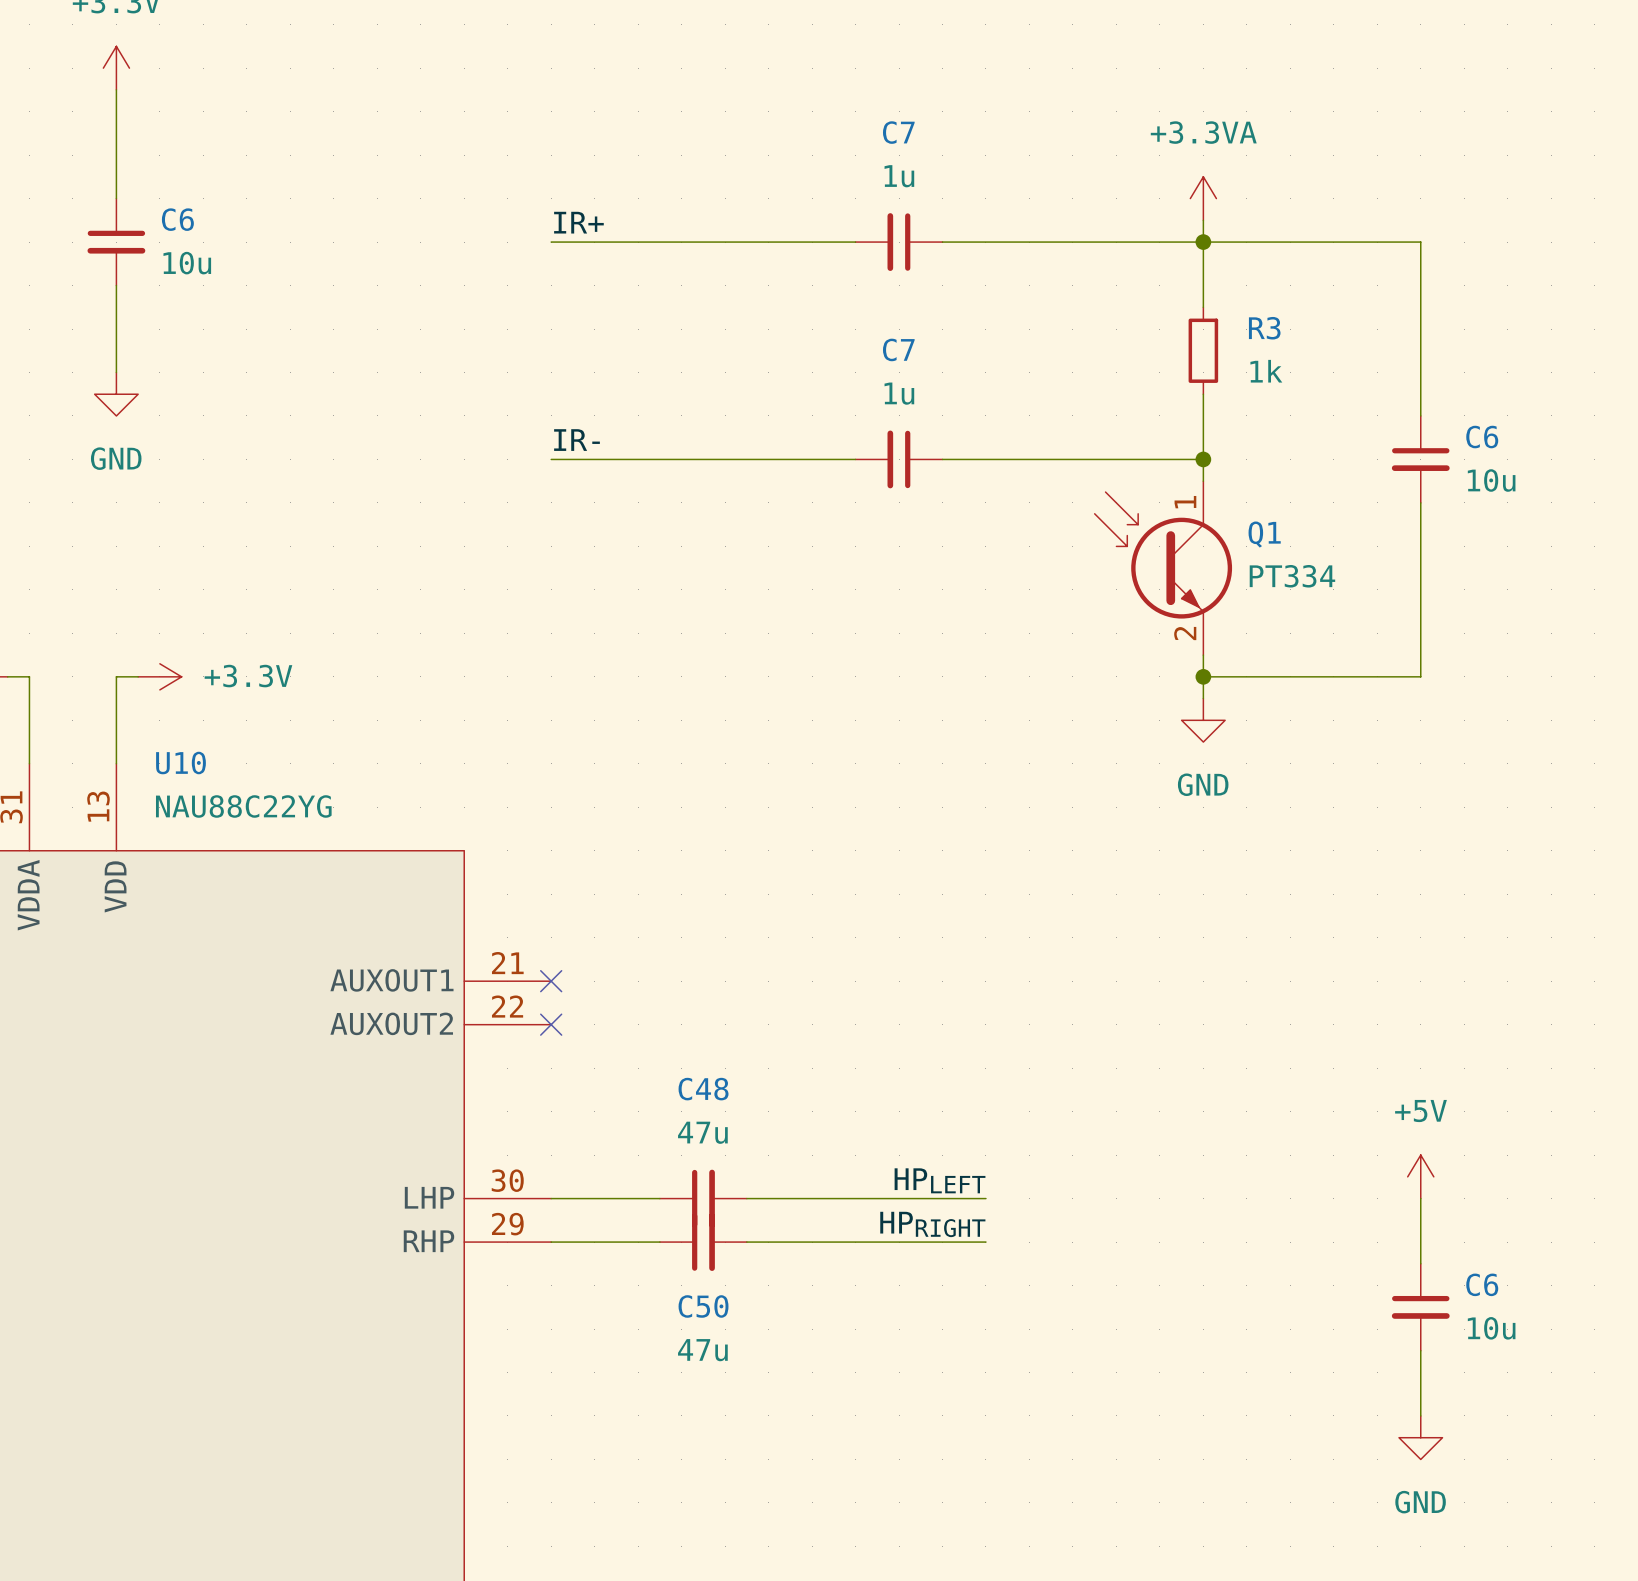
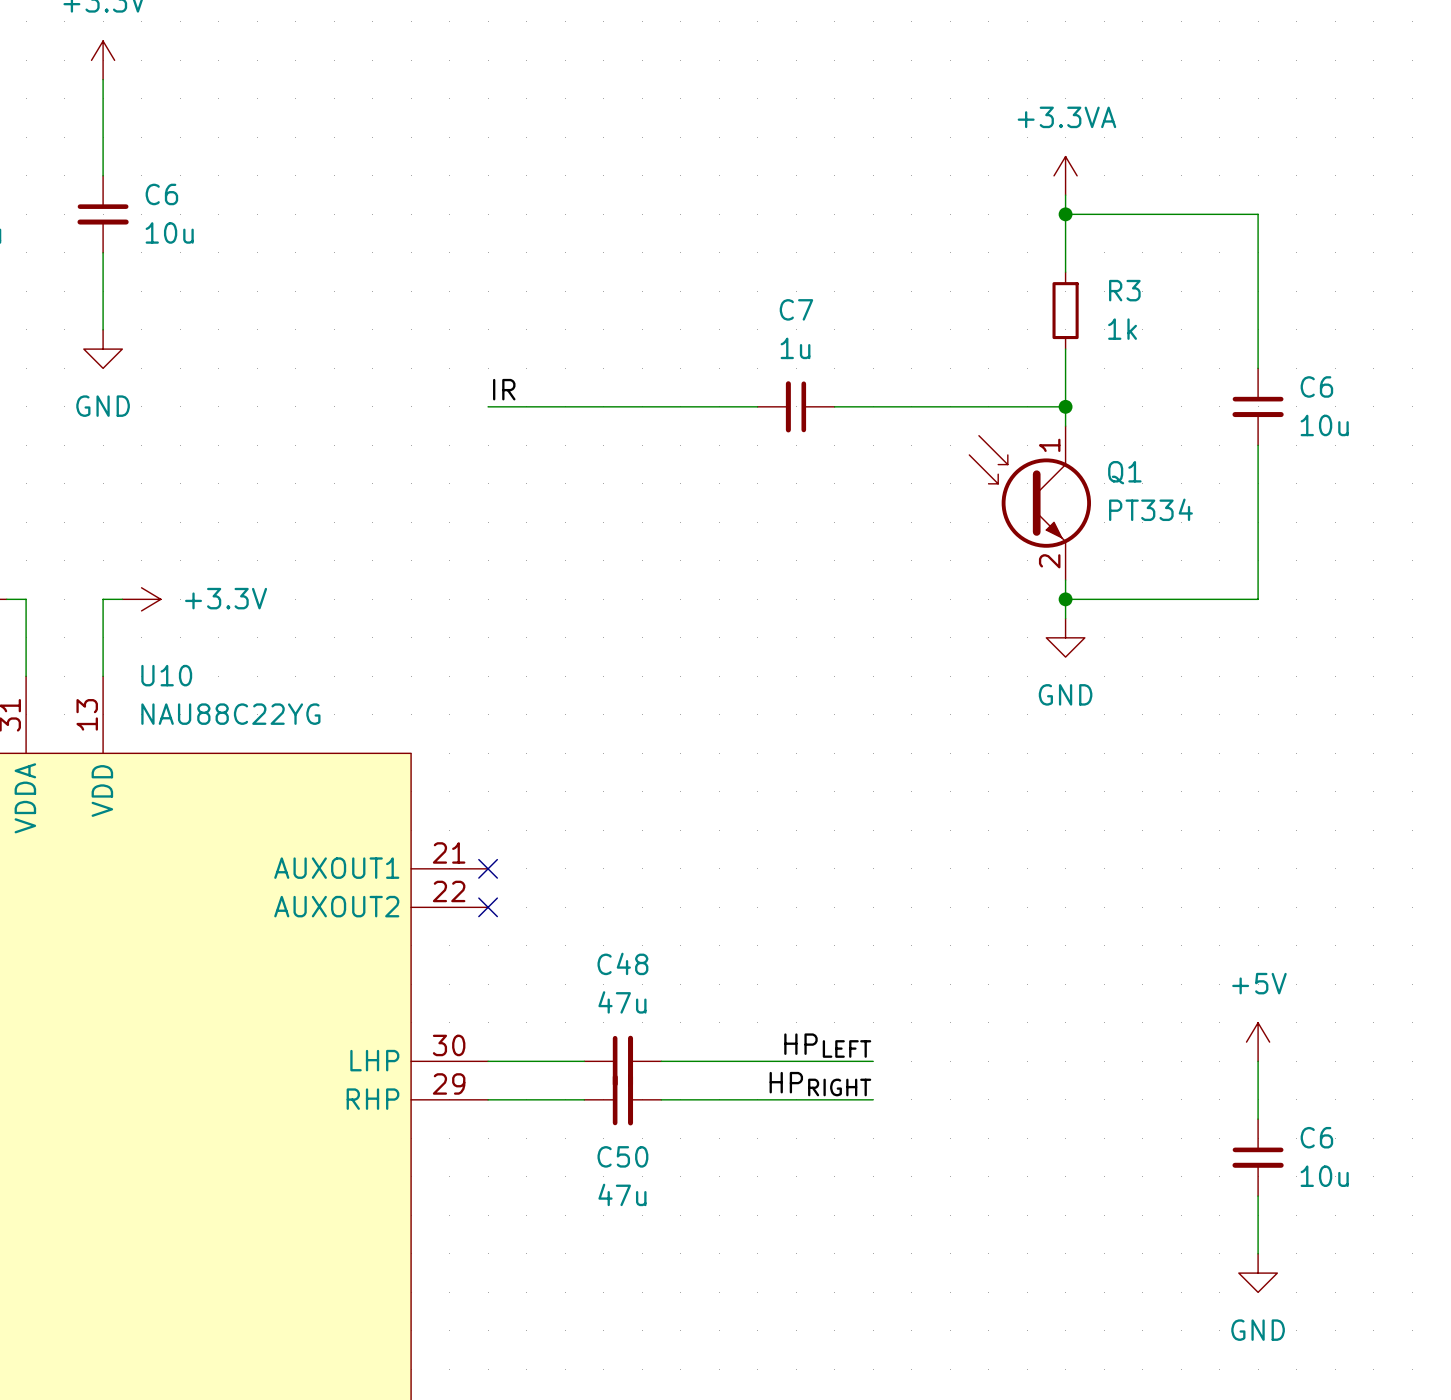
label: IR+ (578, 222) -> none
wire: (551, 242) (855, 242) -> none
C7: 1u (899, 242) -> none
wire: (942, 242) (1203, 242) -> none
label: IR- (576, 440) -> IR (504, 389)

